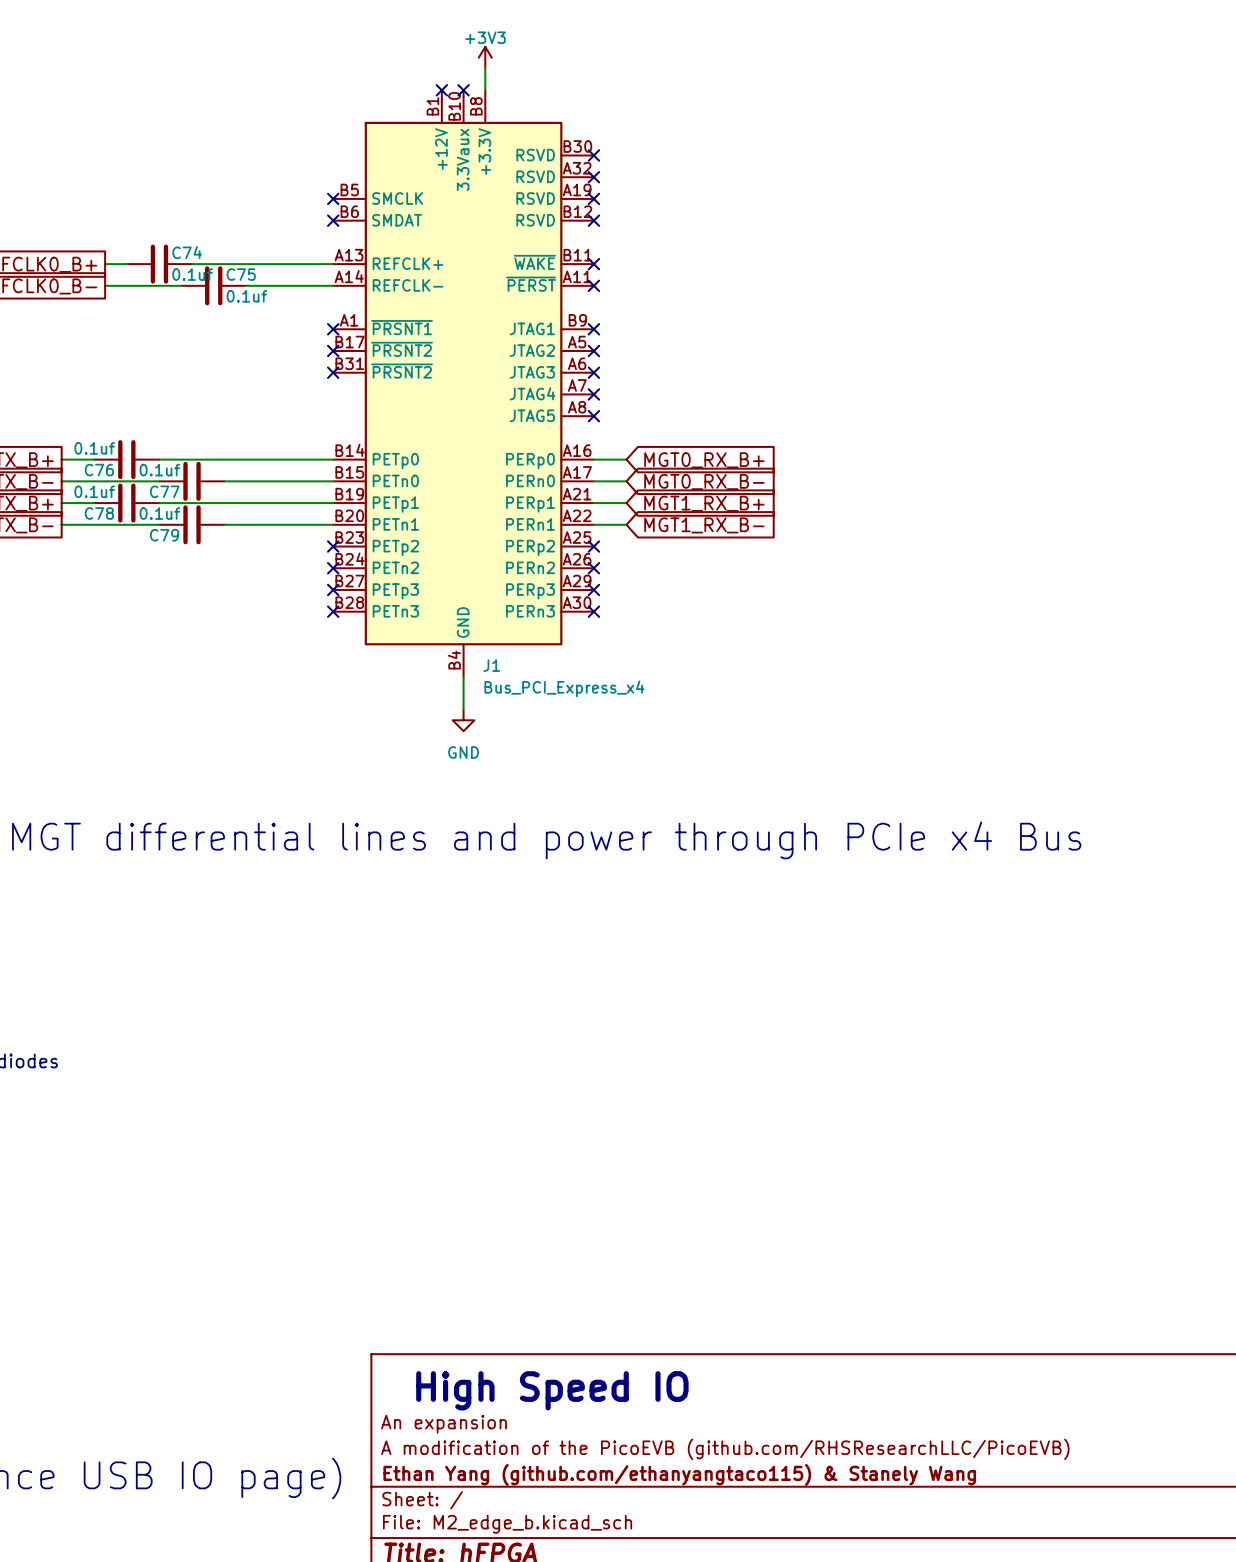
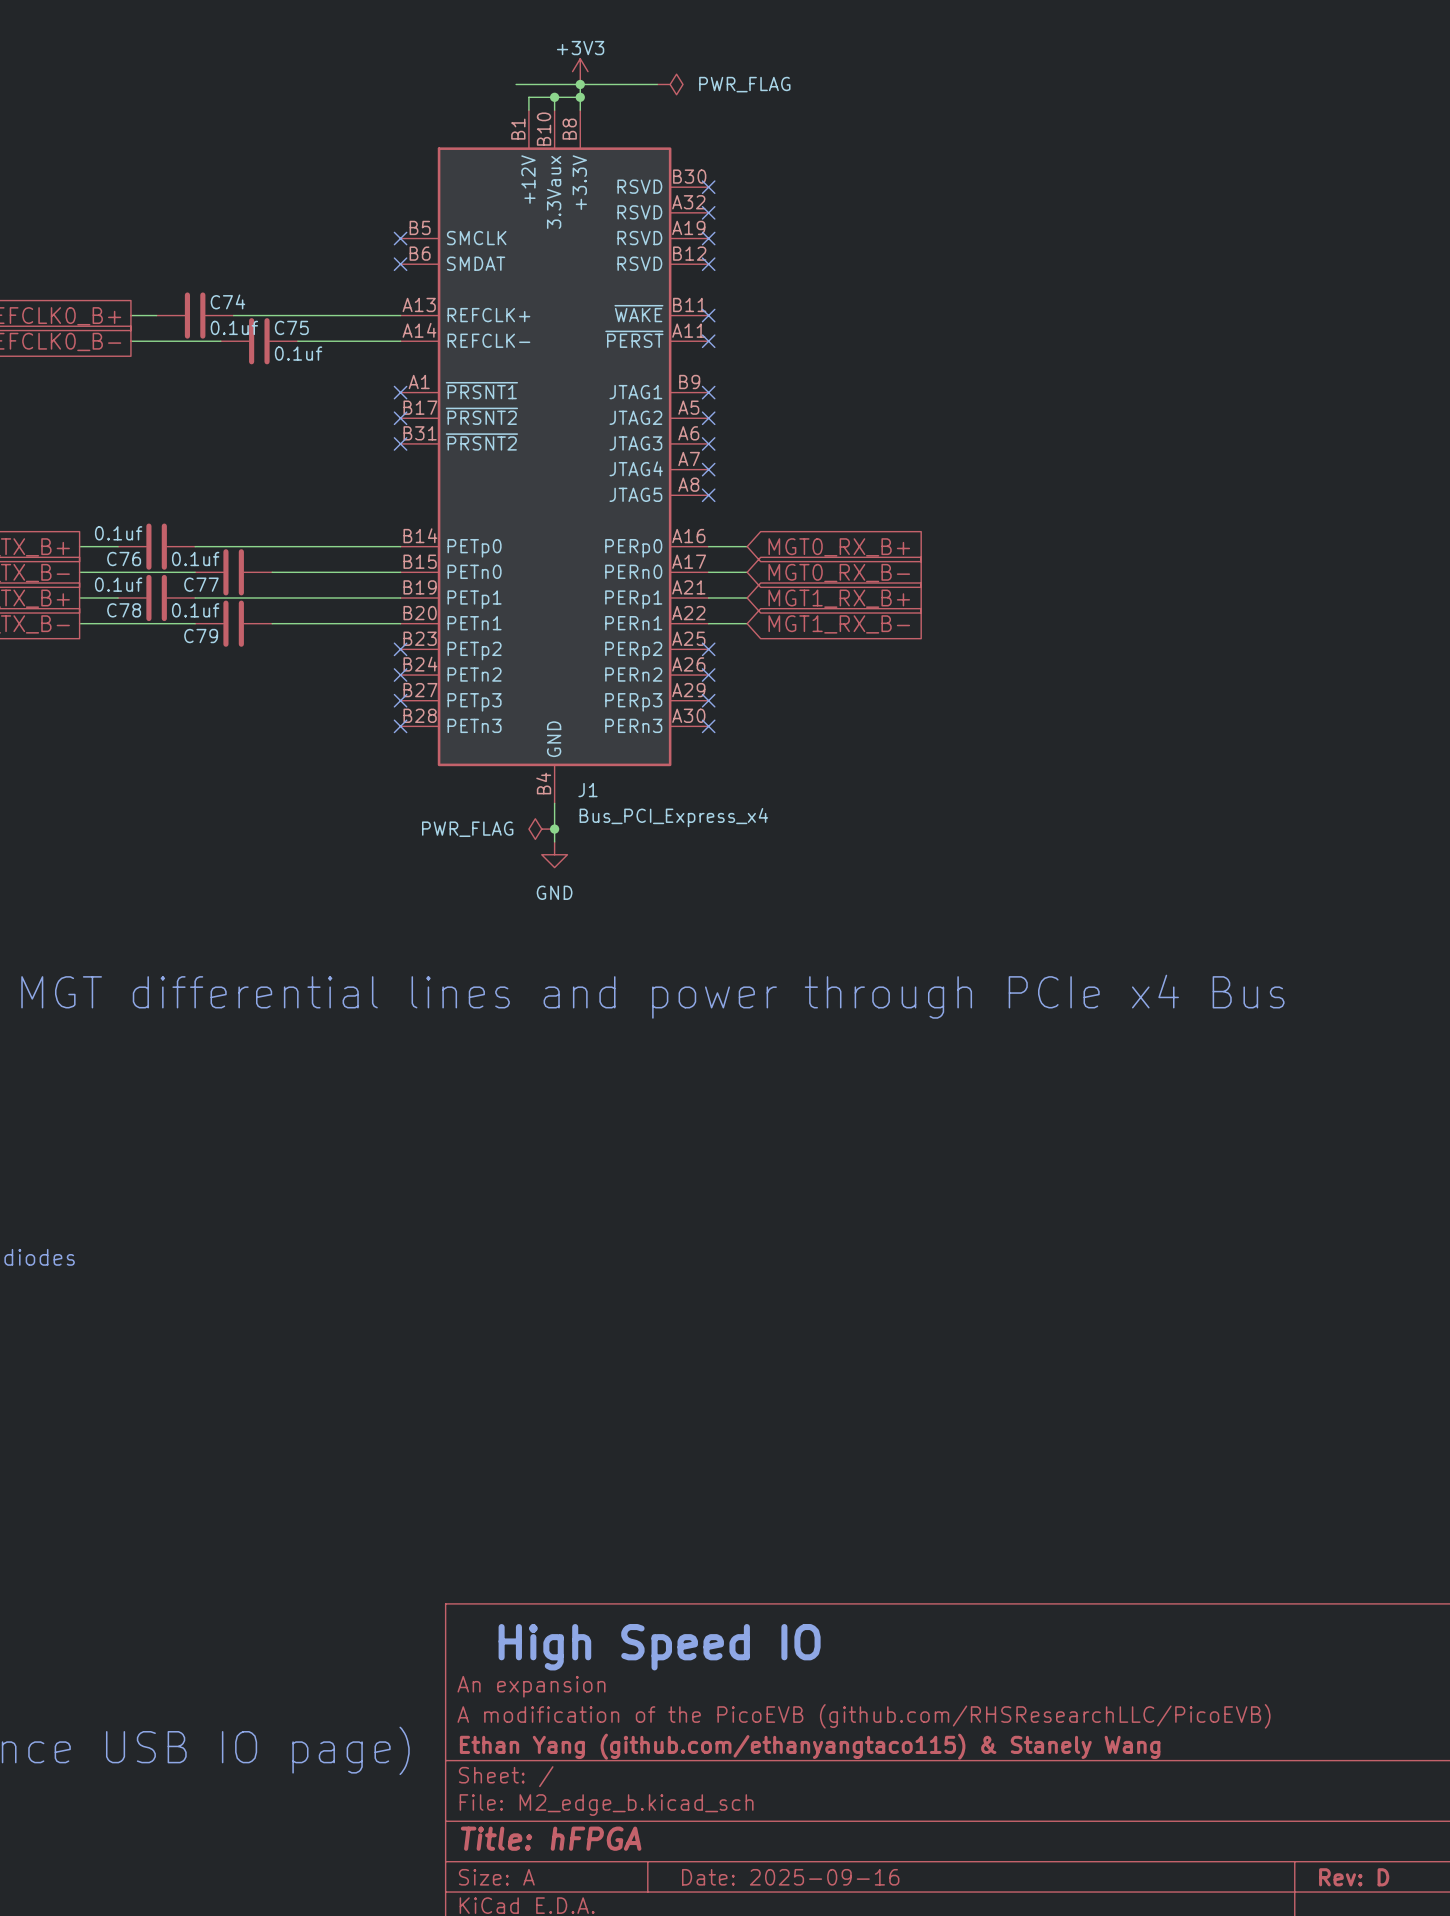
wire: none -> (516, 84) (657, 84)
junction: none -> (580, 84)
power symbol: none -> PWR_FLAG (670, 84)
wire: none -> (554, 97) (554, 110)
junction: none -> (554, 97)
wire: none -> (580, 97) (528, 97) (528, 110)
junction: none -> (580, 97)
no-connect mark: (441, 90) -> none
no-connect mark: (463, 90) -> none
power symbol: none -> PWR_FLAG (541, 829)
junction: none -> (554, 829)

